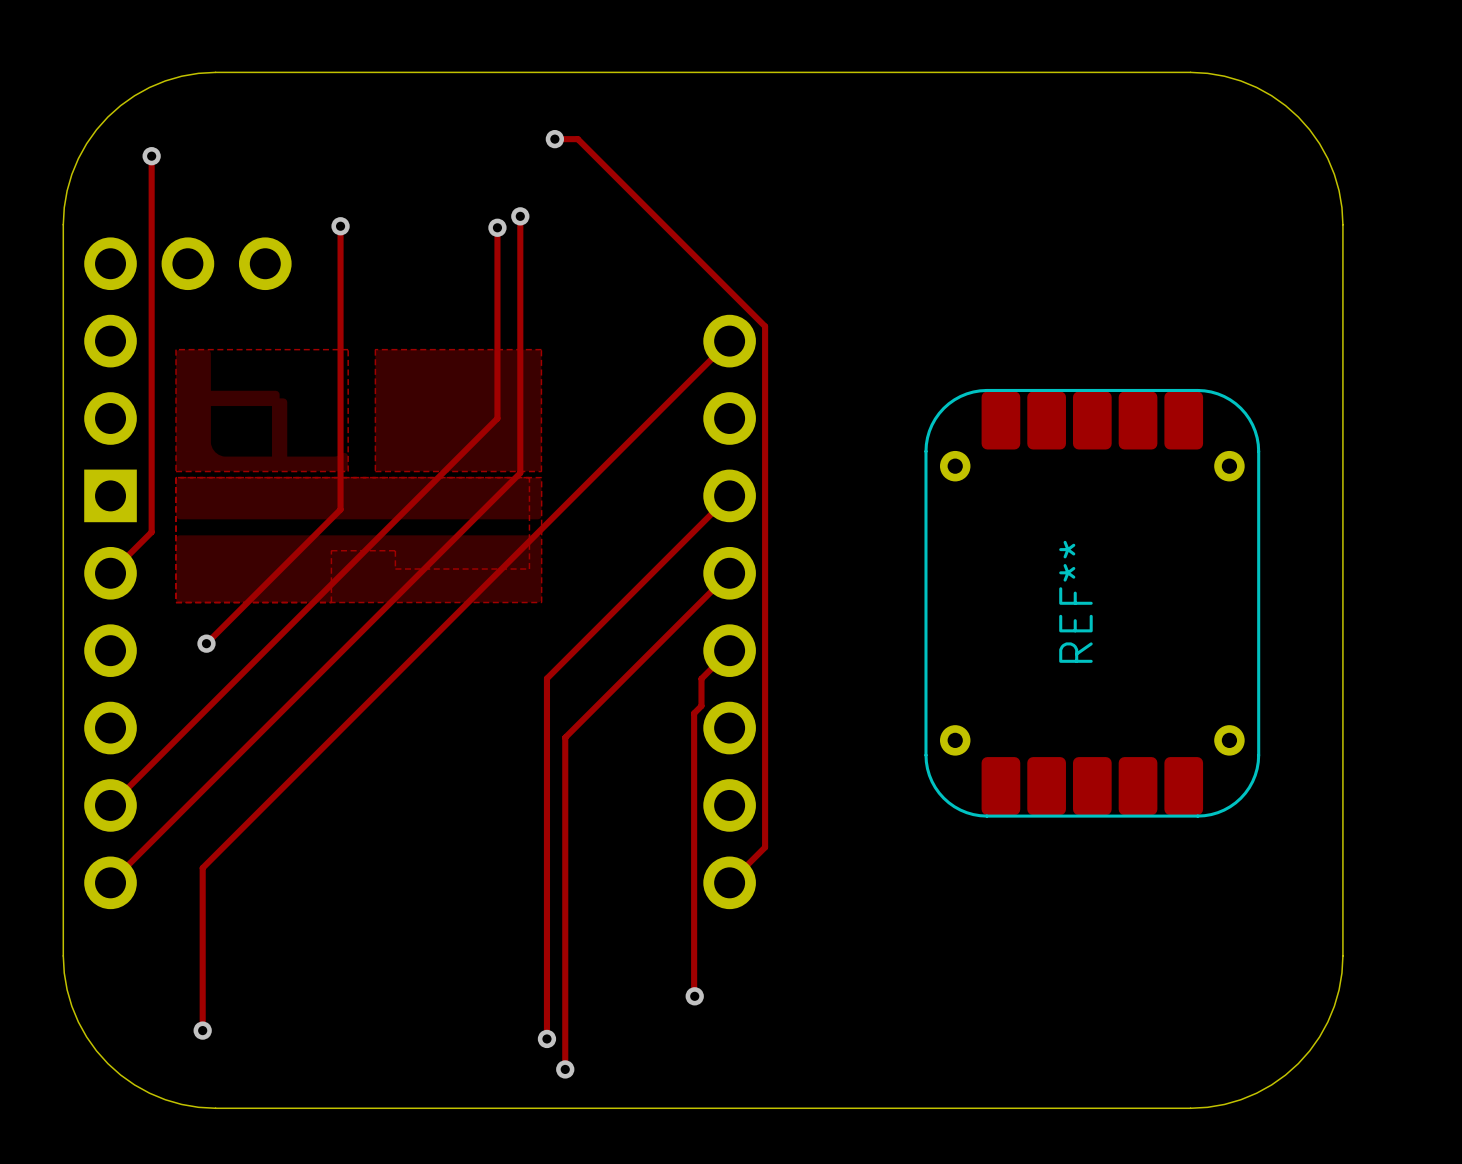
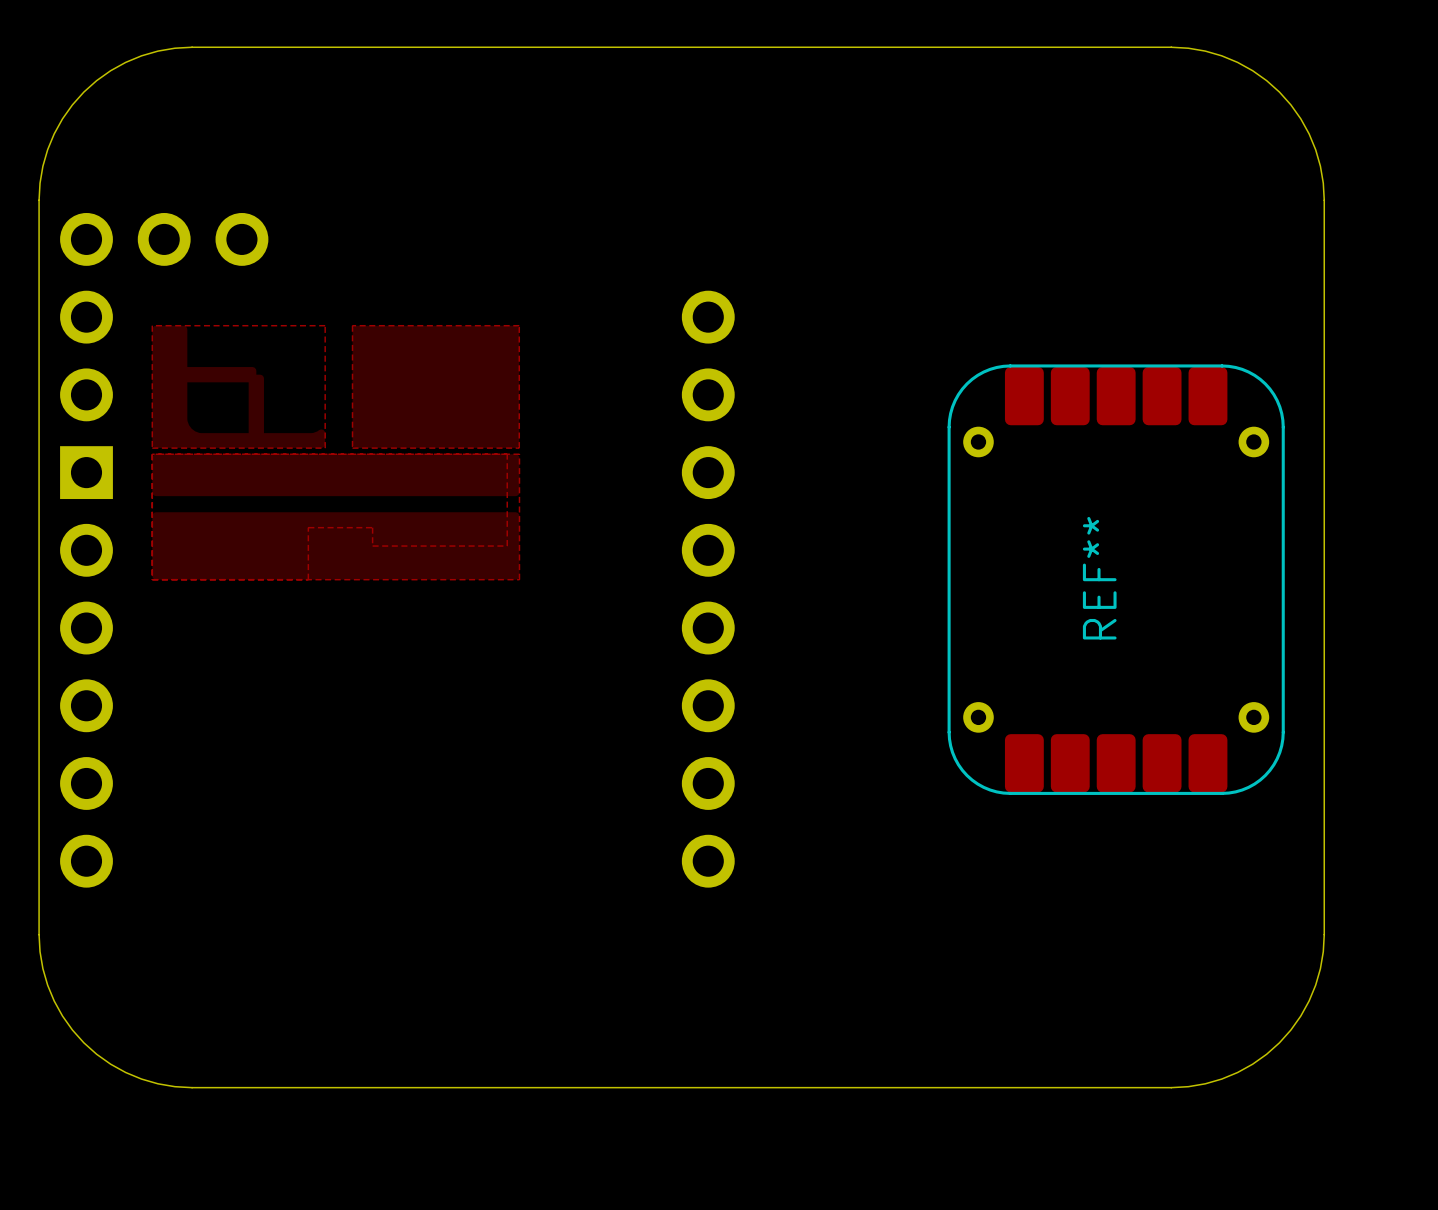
track: (554, 139) (577, 139) (765, 326) (765, 847) (729, 882) -> none
via: (554, 139) -> none
track: (151, 156) (151, 532) (110, 573) -> none
via: (151, 156) -> none
track: (520, 216) (520, 473) (110, 882) -> none
via: (520, 216) -> none
track: (340, 226) (340, 509) (206, 643) -> none
via: (340, 226) -> none
track: (497, 227) (497, 418) (110, 805) -> none
via: (497, 227) -> none
track: (729, 341) (202, 868) (202, 1030) -> none
track: (729, 495) (546, 678) (546, 1038) -> none
track: (729, 573) (565, 737) (565, 1069) -> none
REF** position: (1092, 603) -> (1116, 579)
via: (206, 643) -> none
track: (729, 650) (701, 678) (701, 706) (694, 713) (694, 996) -> none
via: (694, 996) -> none
via: (202, 1030) -> none
via: (546, 1038) -> none
via: (565, 1069) -> none

